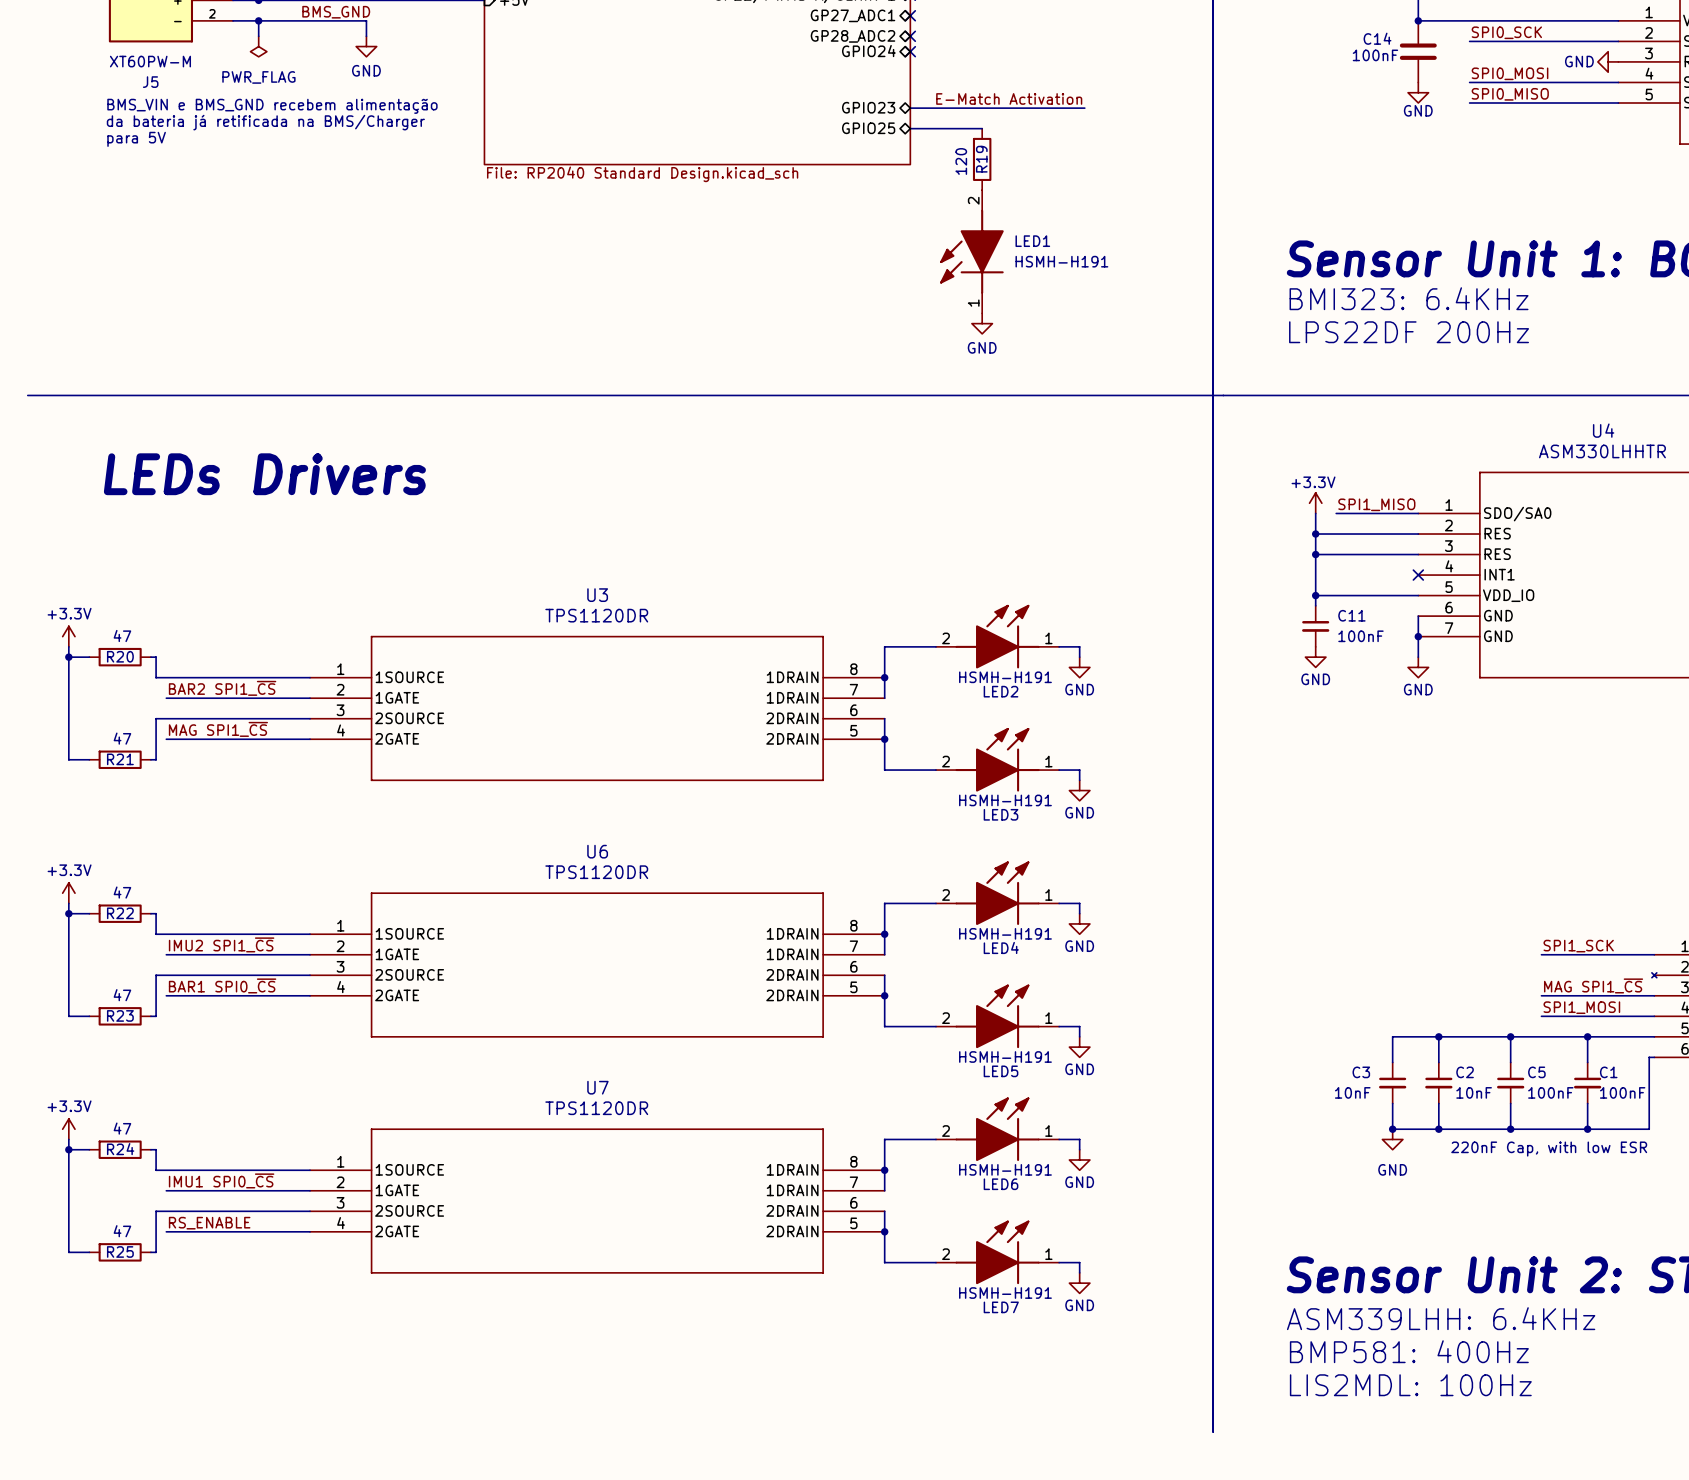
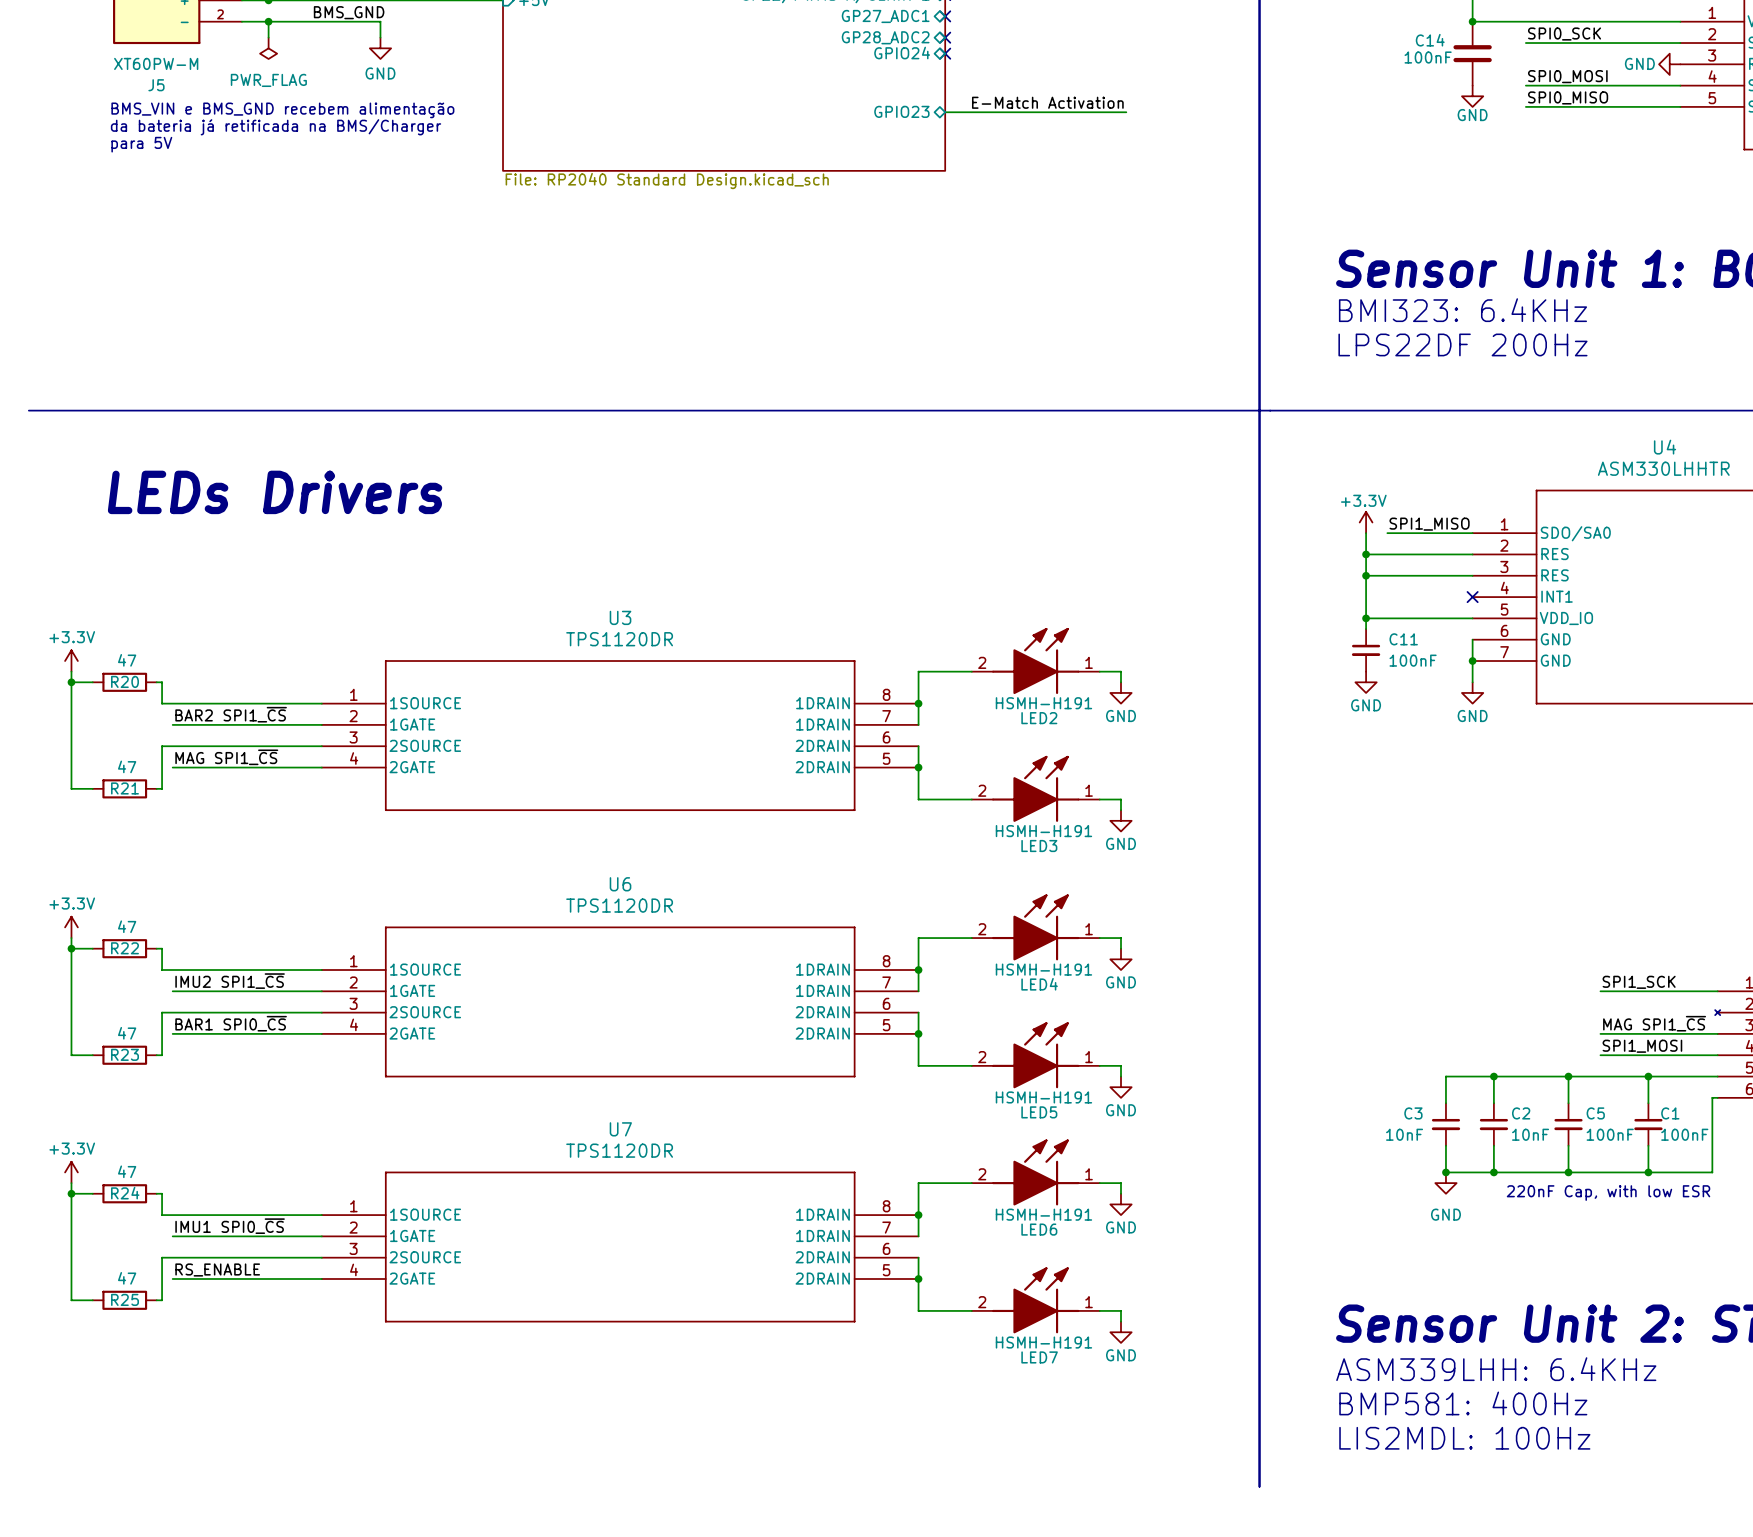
sheet pin: GPIO25 (868, 128) -> none
wire: (910, 128) (982, 128) -> none
R19: 120 (982, 159) -> none
LED1: HSMH-H191 (971, 251) -> none
power symbol: GND (982, 323) -> none

